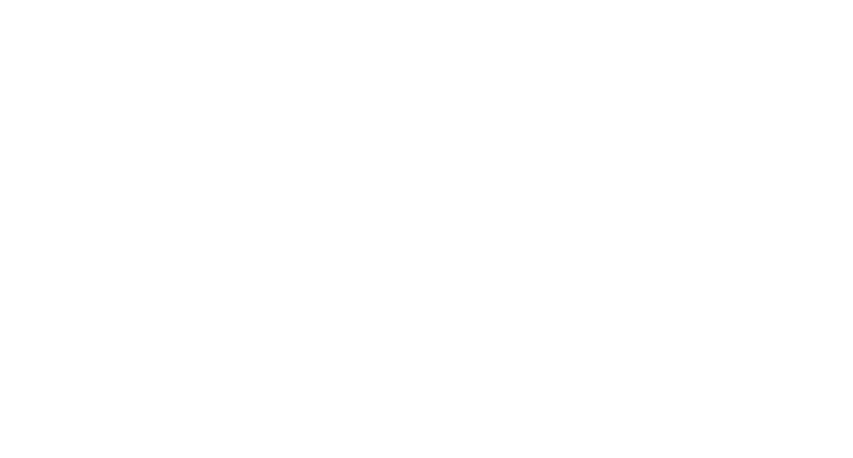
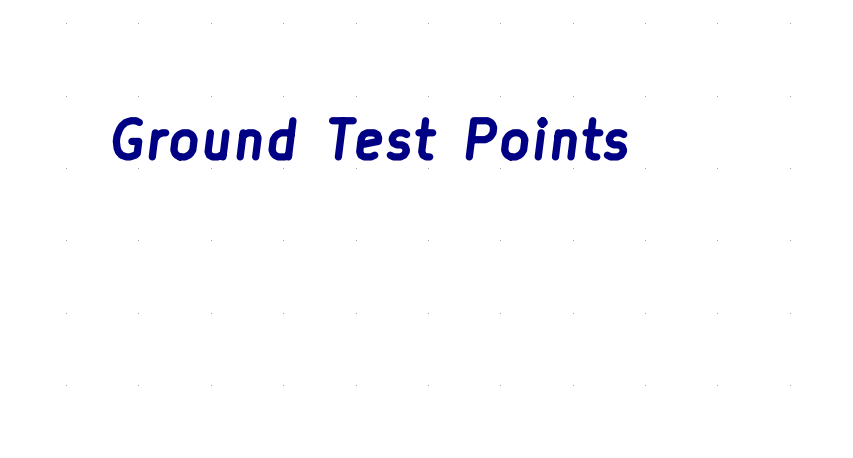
text: none -> Ground Test Points (370, 138)

